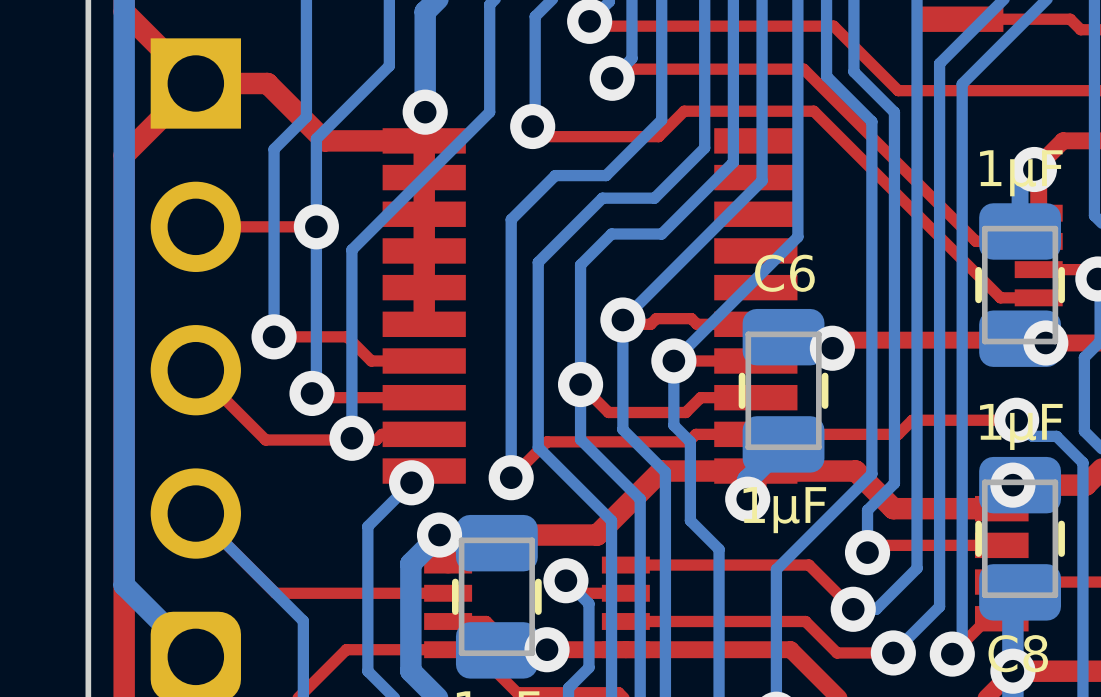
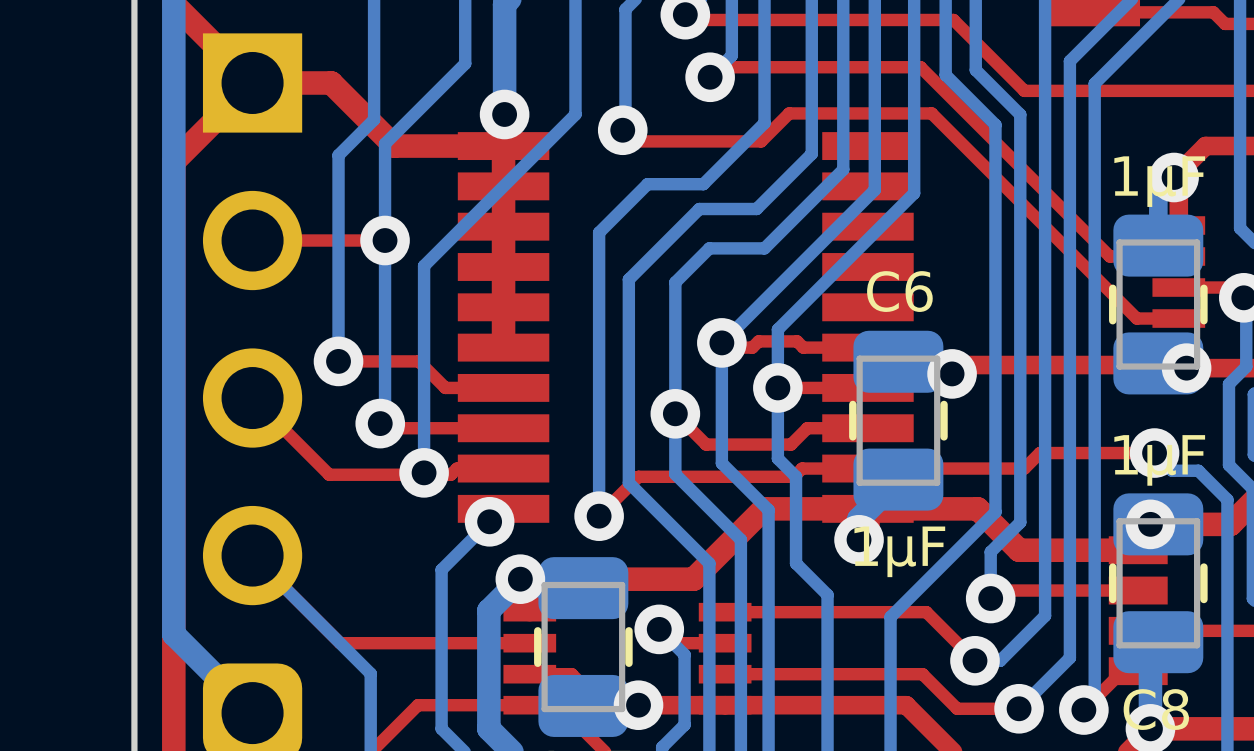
bottom track: (797, 183) (797, 236) (673, 360) -> (914, 193) (777, 329) (777, 387)

